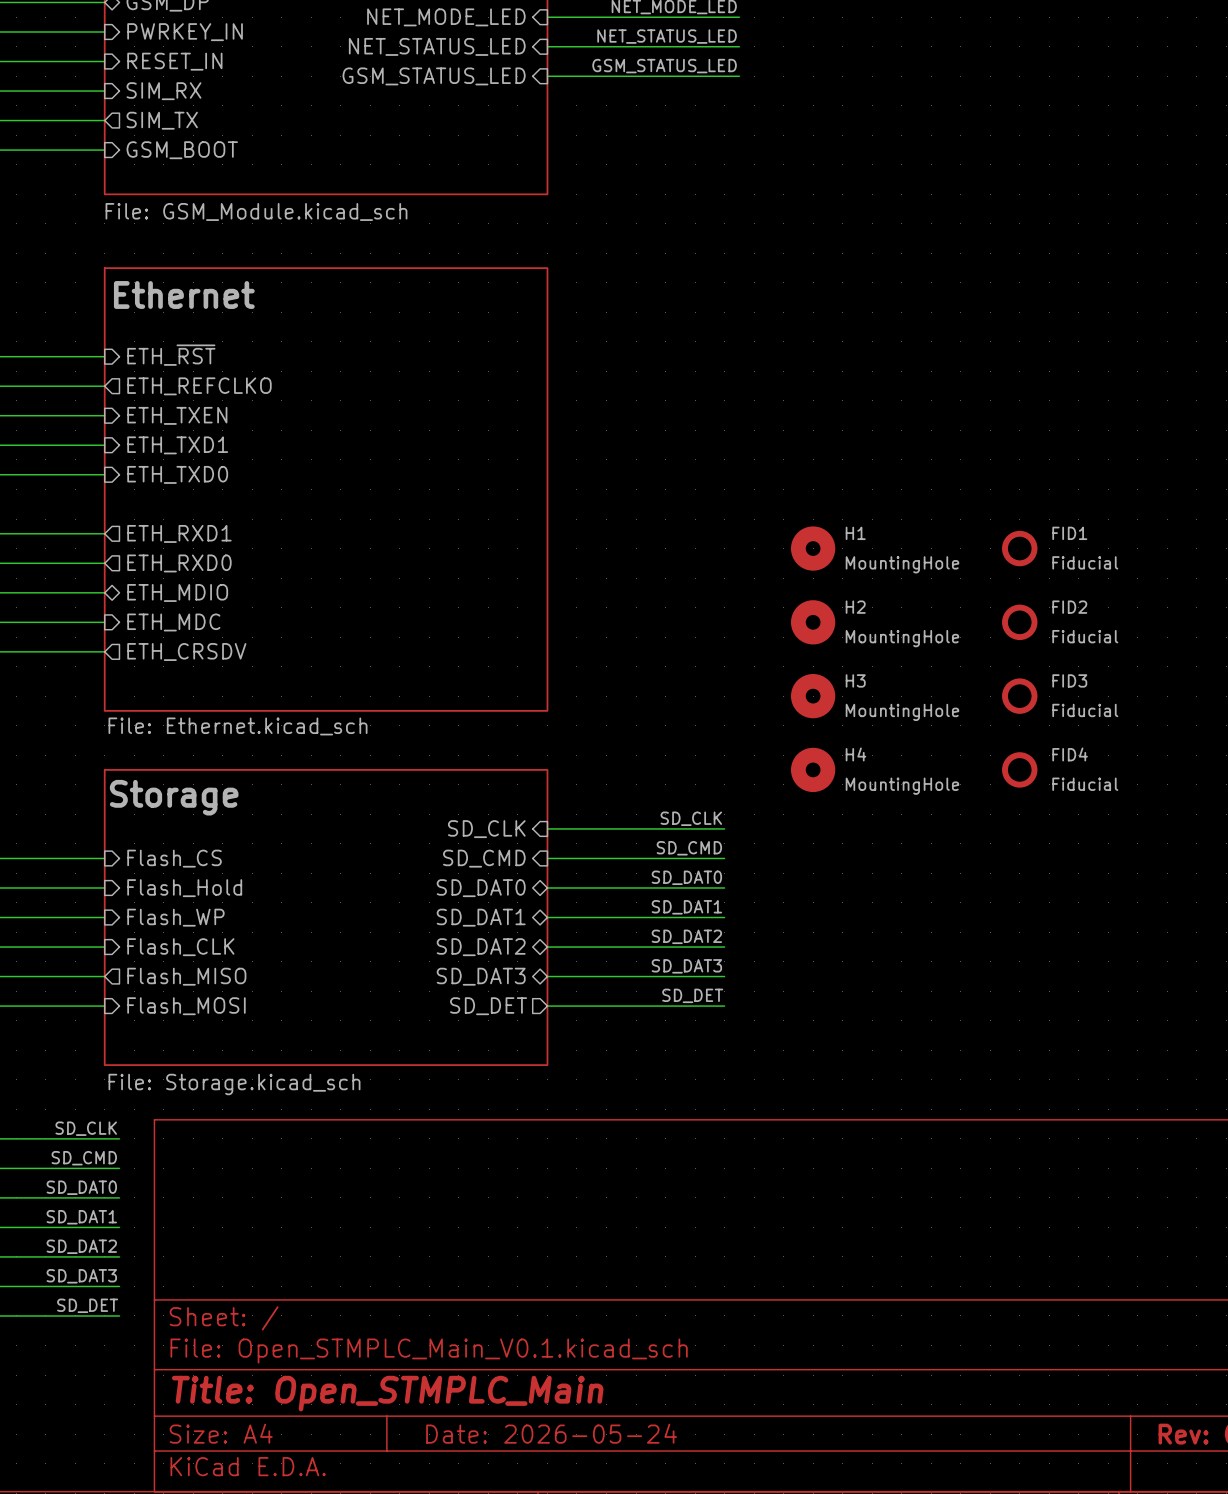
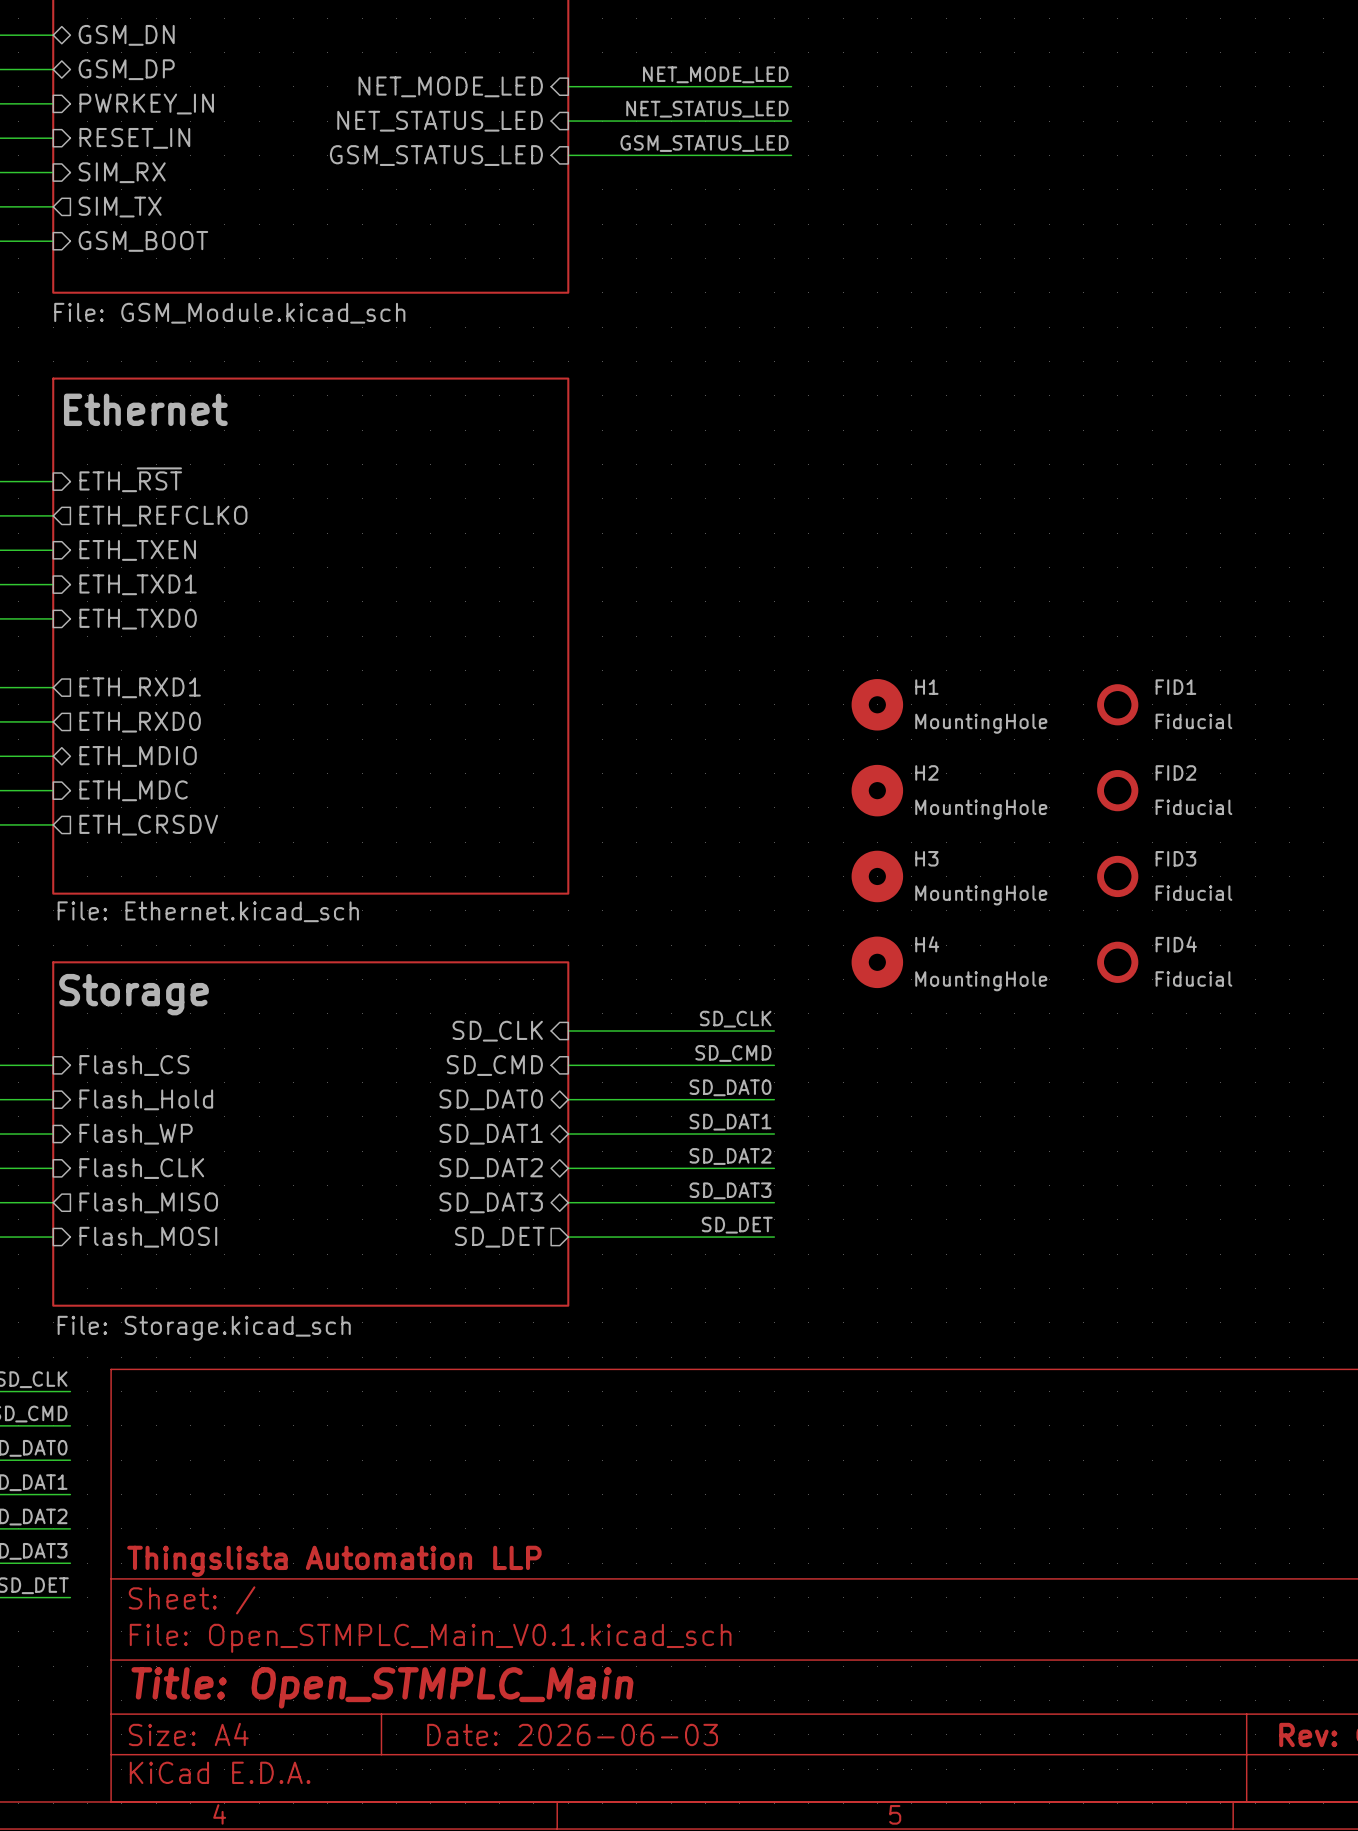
title block: none -> Thingslista Automation LLP (334, 1561)
title block: Date: 2026-05-24 (551, 1433) -> Date: 2026-06-03 (572, 1734)

